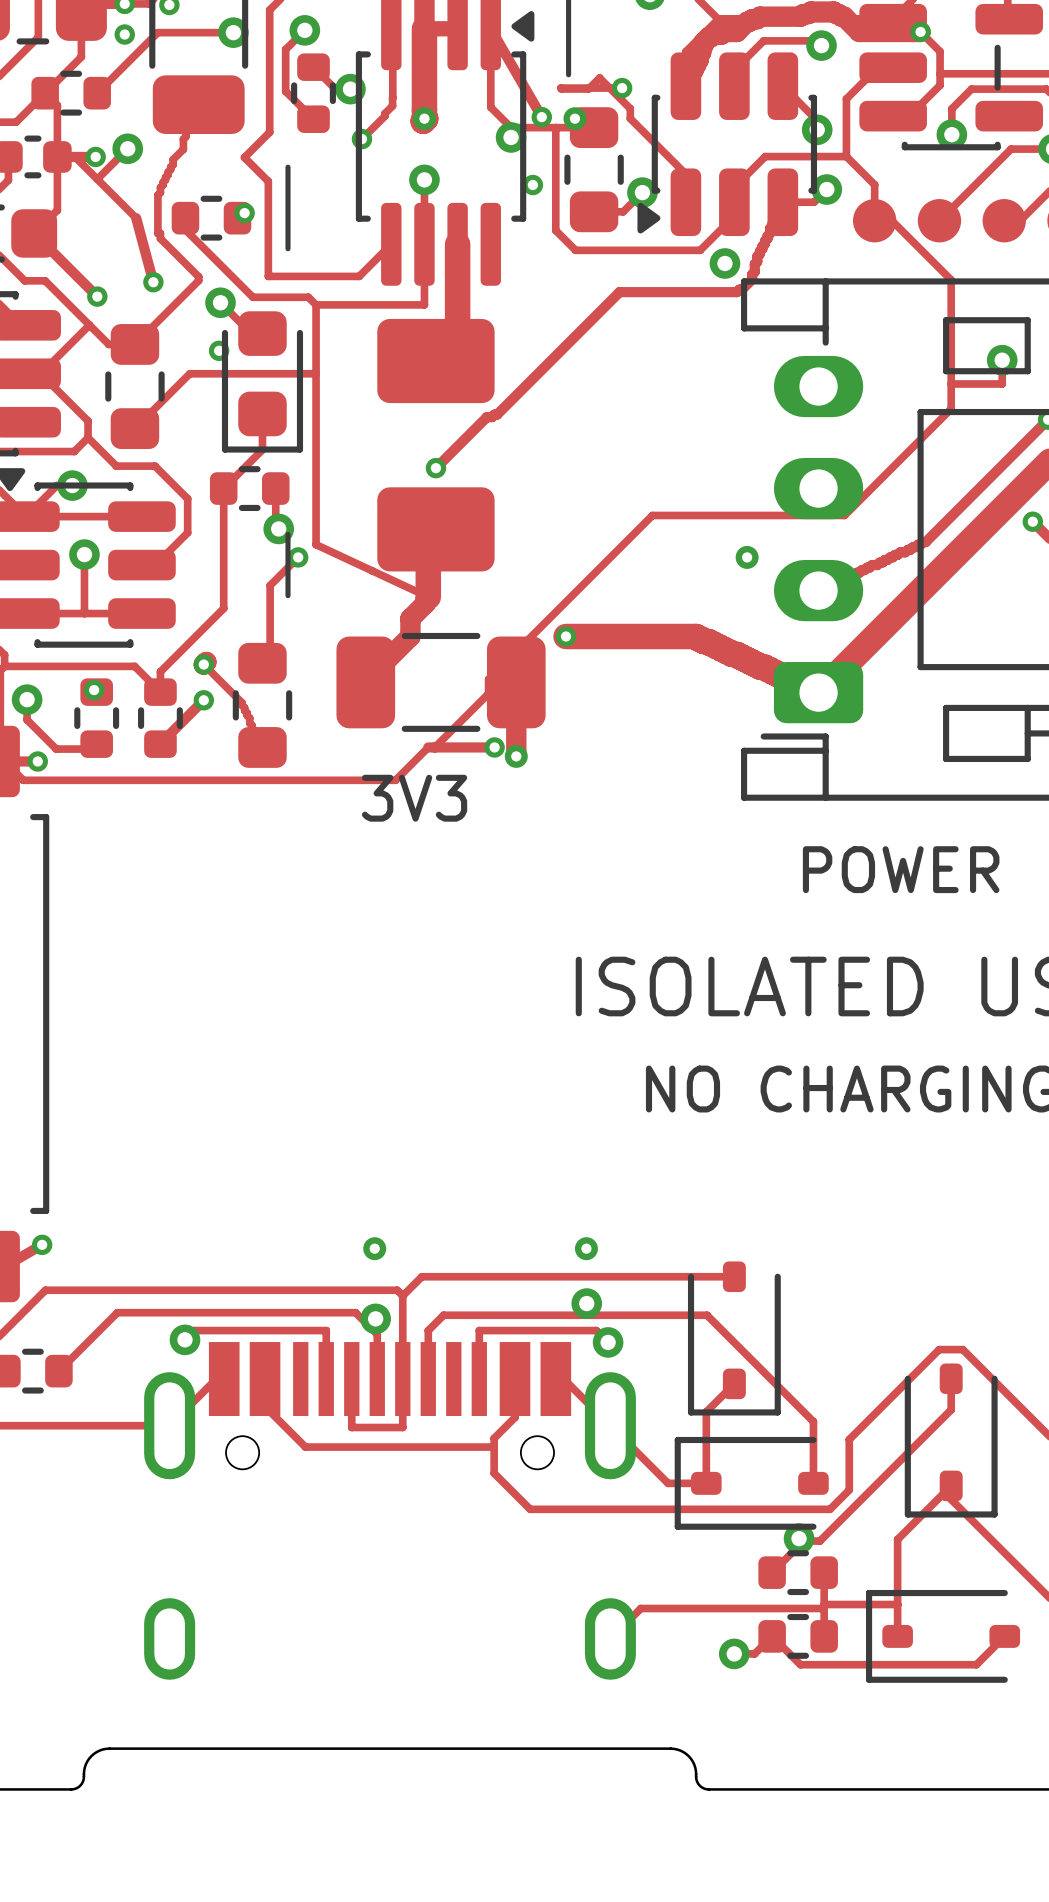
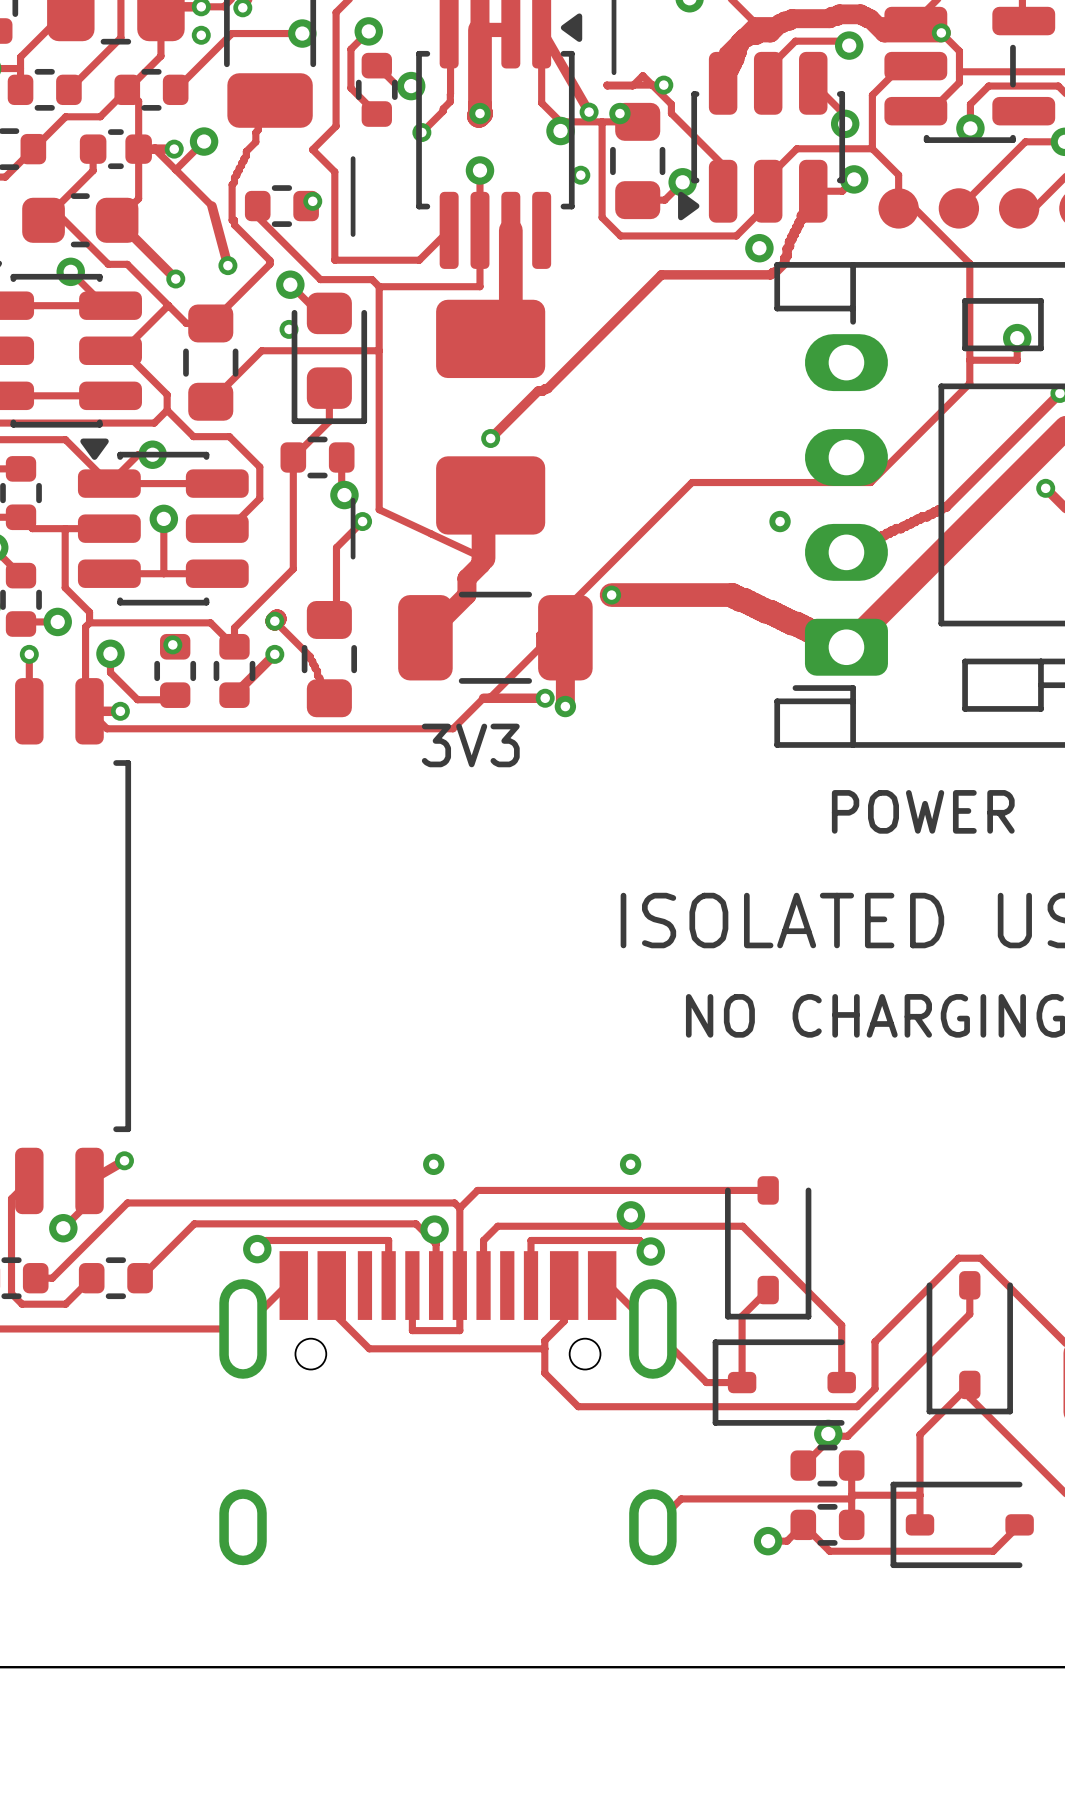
board edge: (71, 1789) (77, 1787) (81, 1783) (85, 1764) (91, 1756) (99, 1750) (109, 1748) (673, 1748) (683, 1752) (690, 1758) (695, 1767) (698, 1783) (703, 1788) (708, 1789) -> (151, 1667) (744, 1667)

